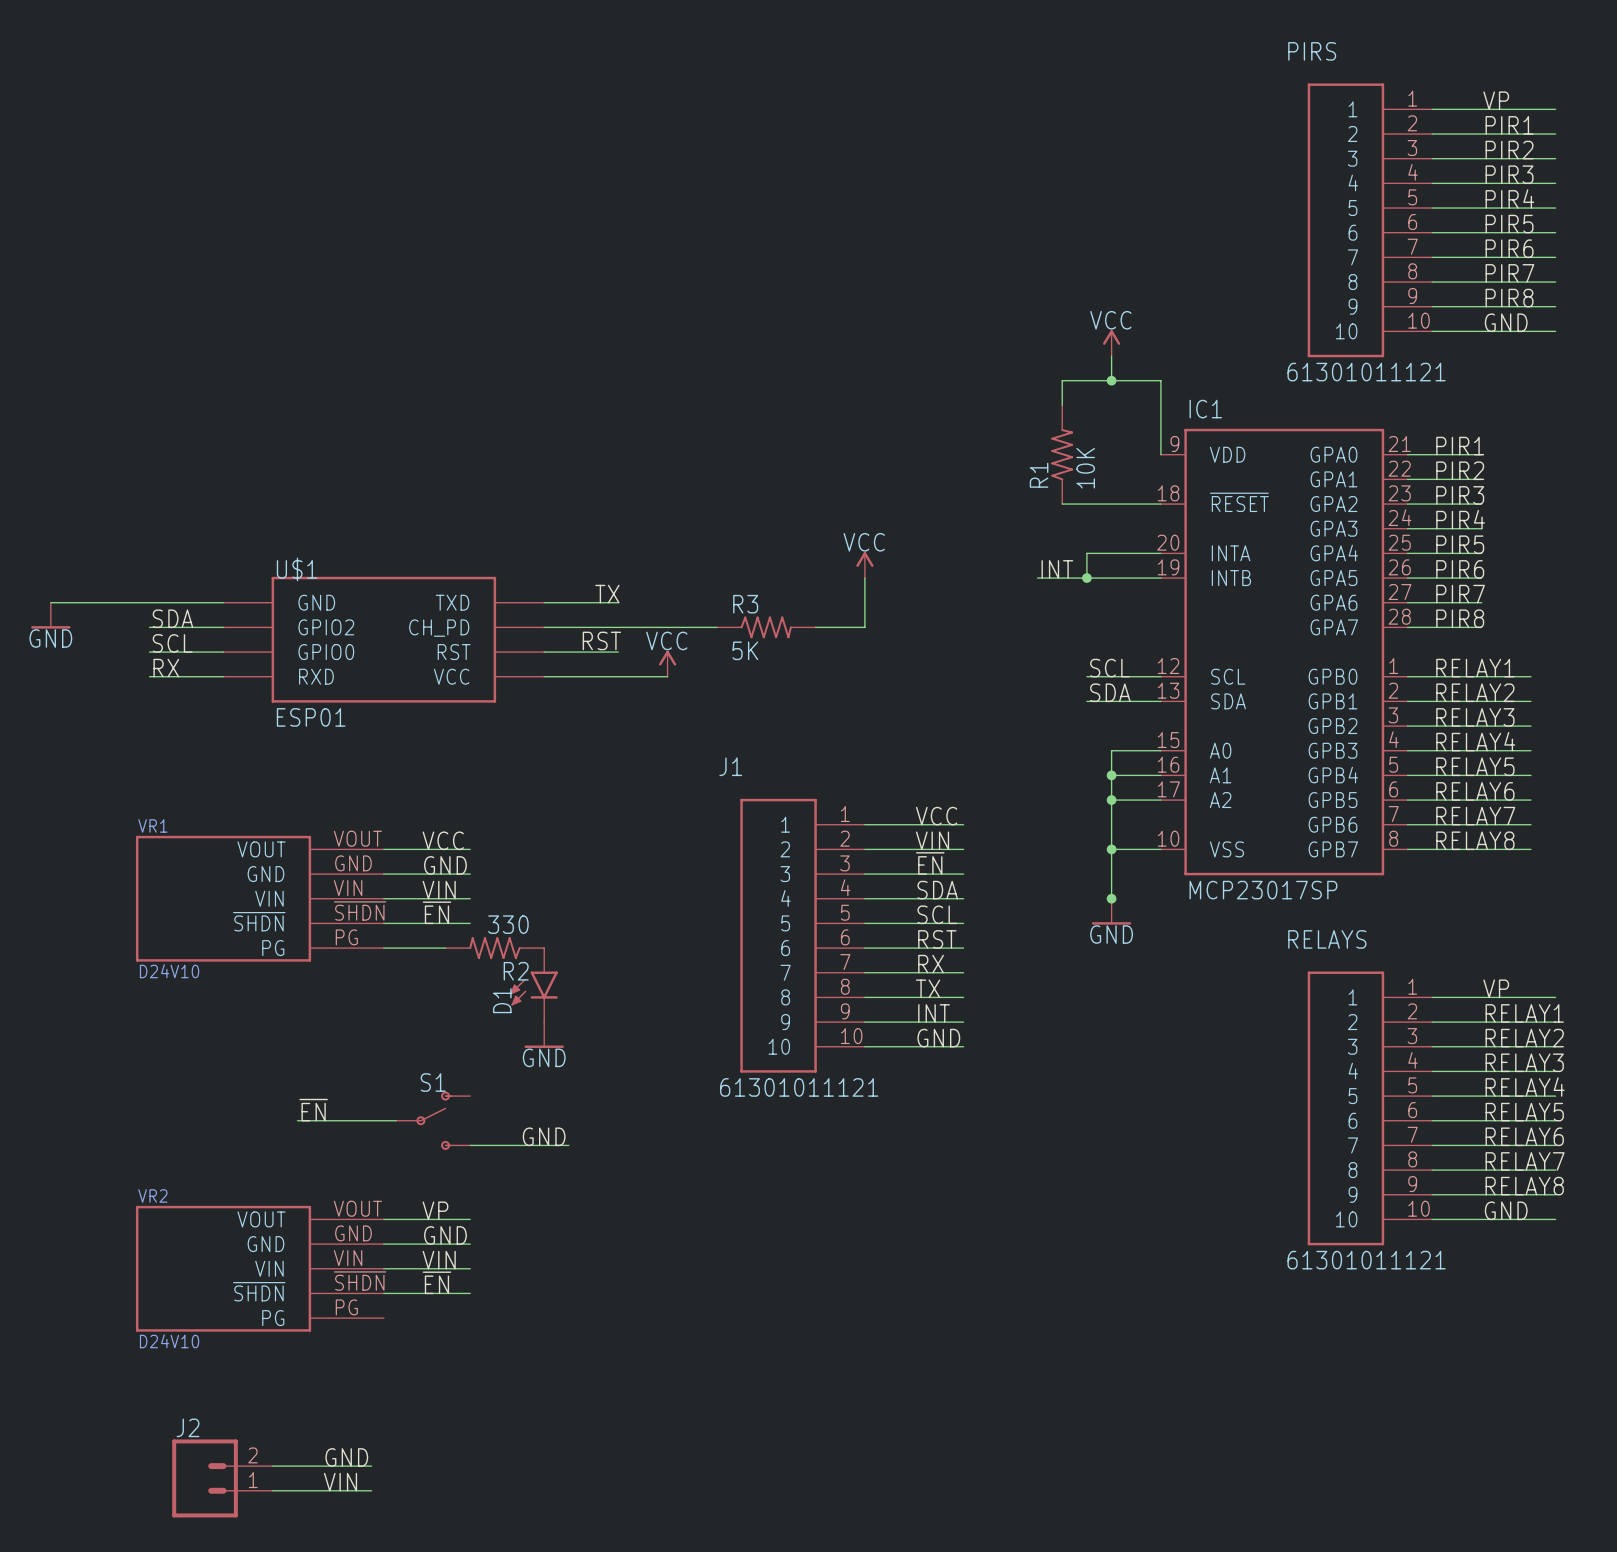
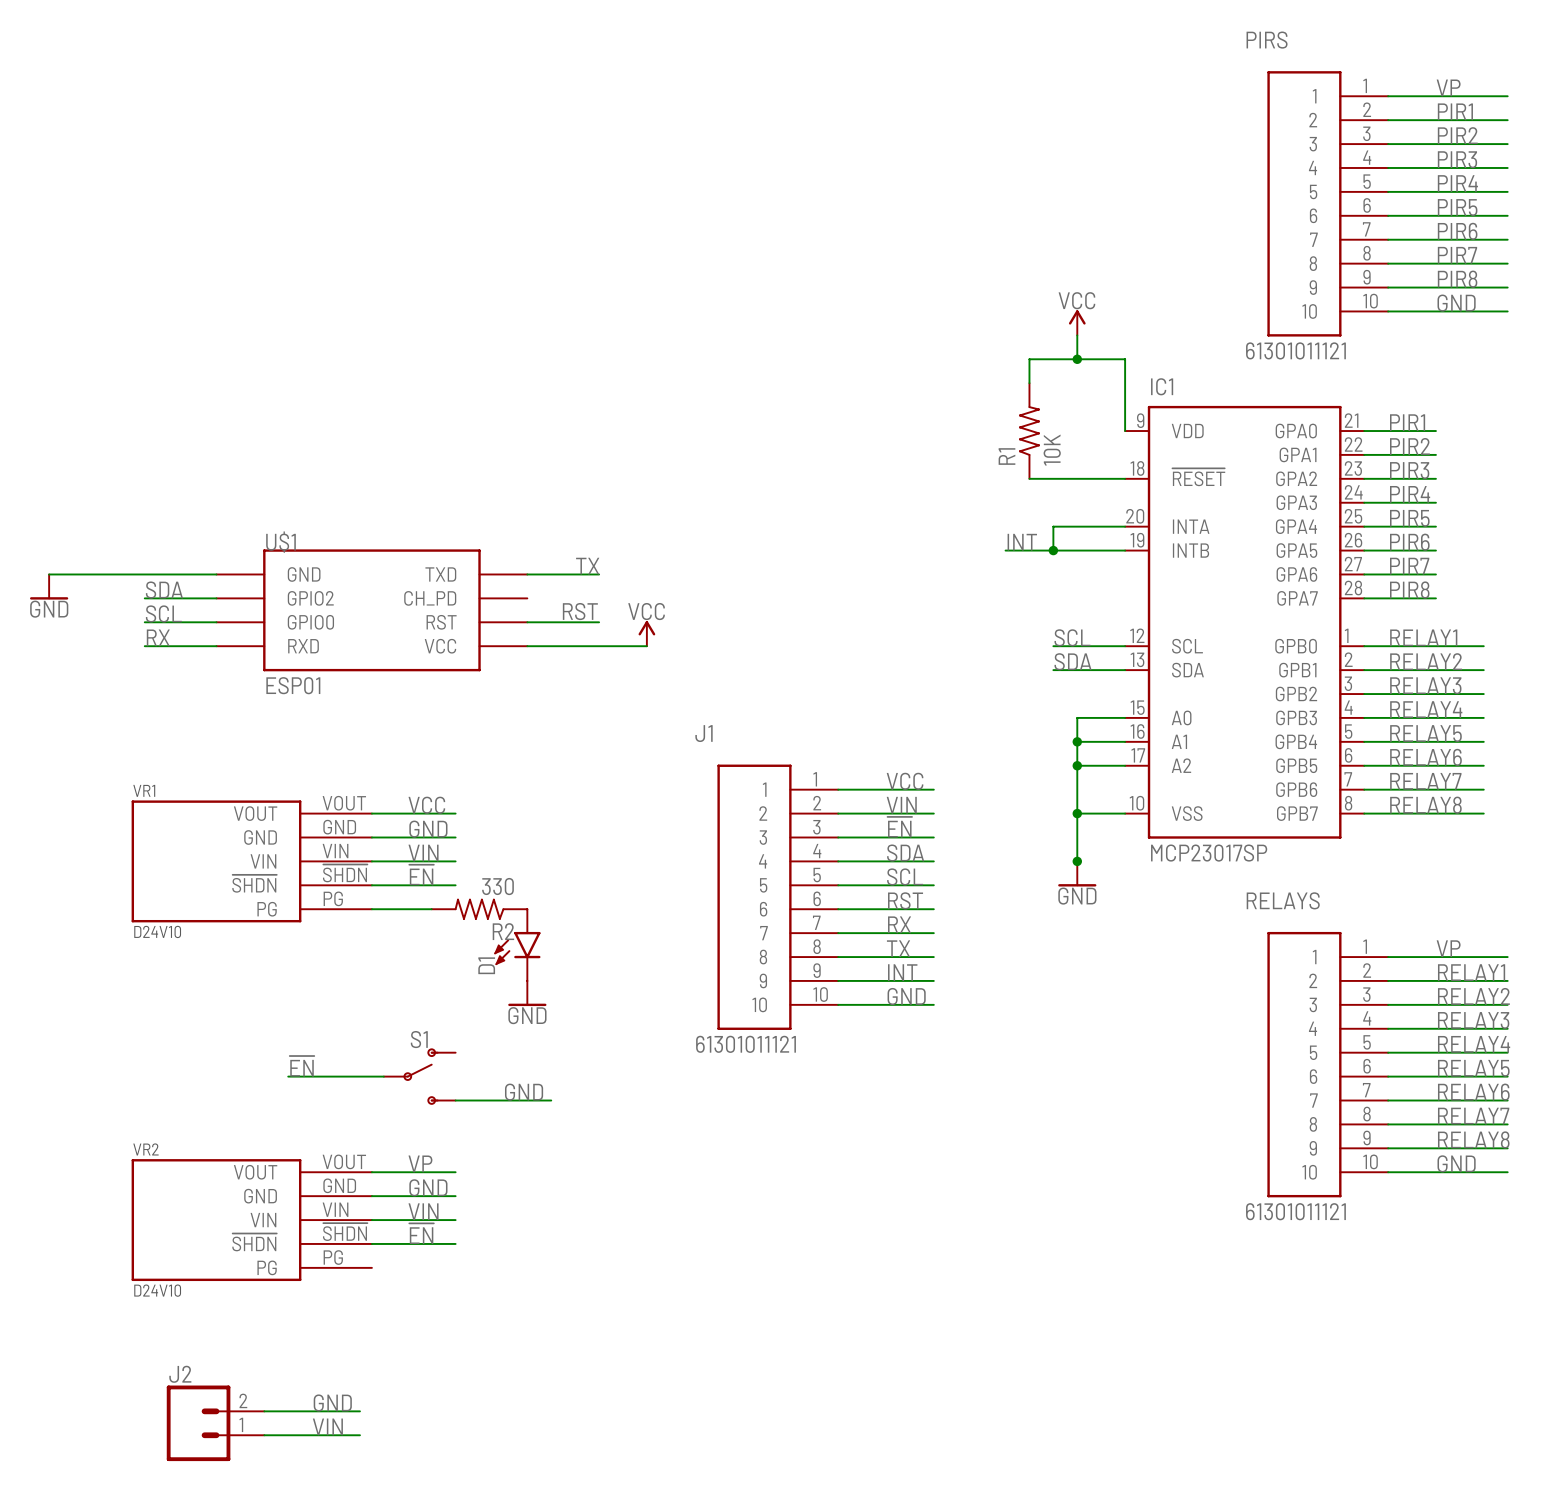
power symbol: VCC (864, 565) -> none
wire: (864, 578) (864, 627) (815, 627) -> none
wire: (544, 627) (716, 627) -> none
R3: 5K (766, 627) -> none

